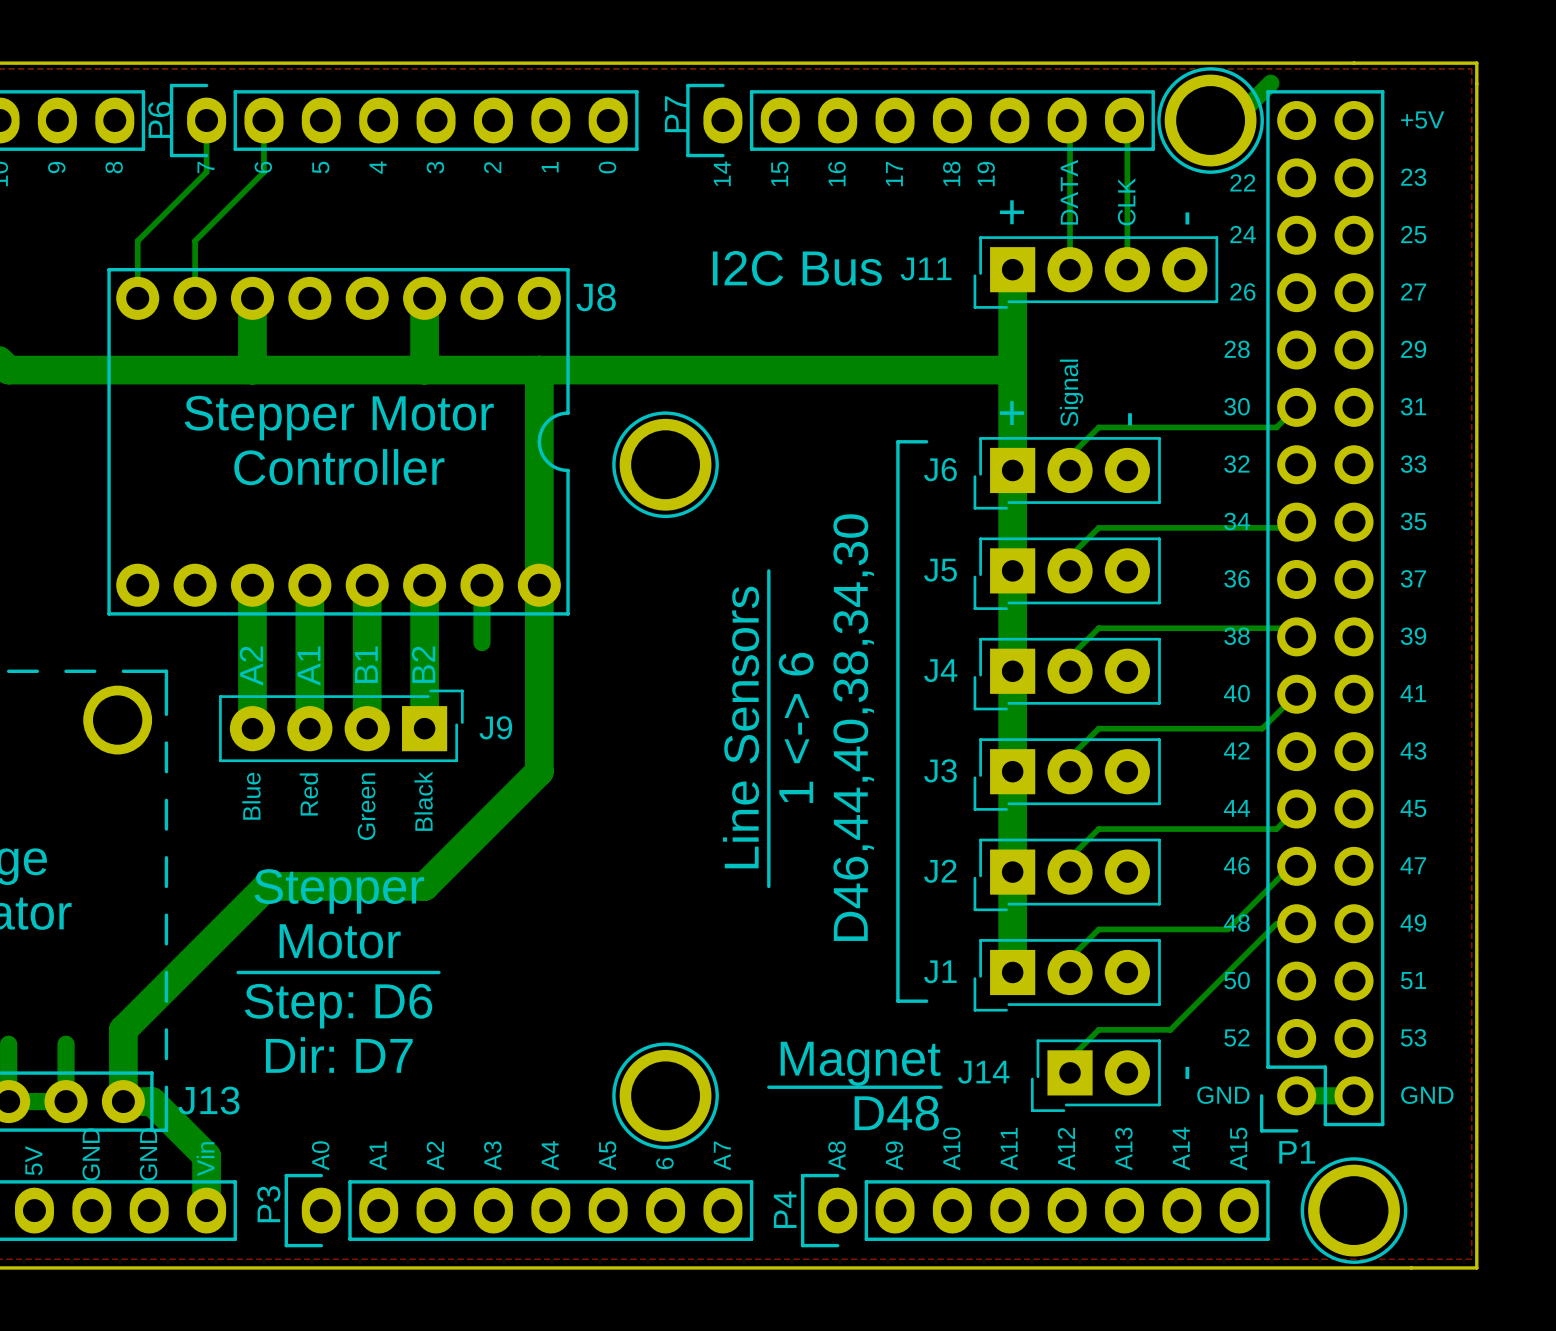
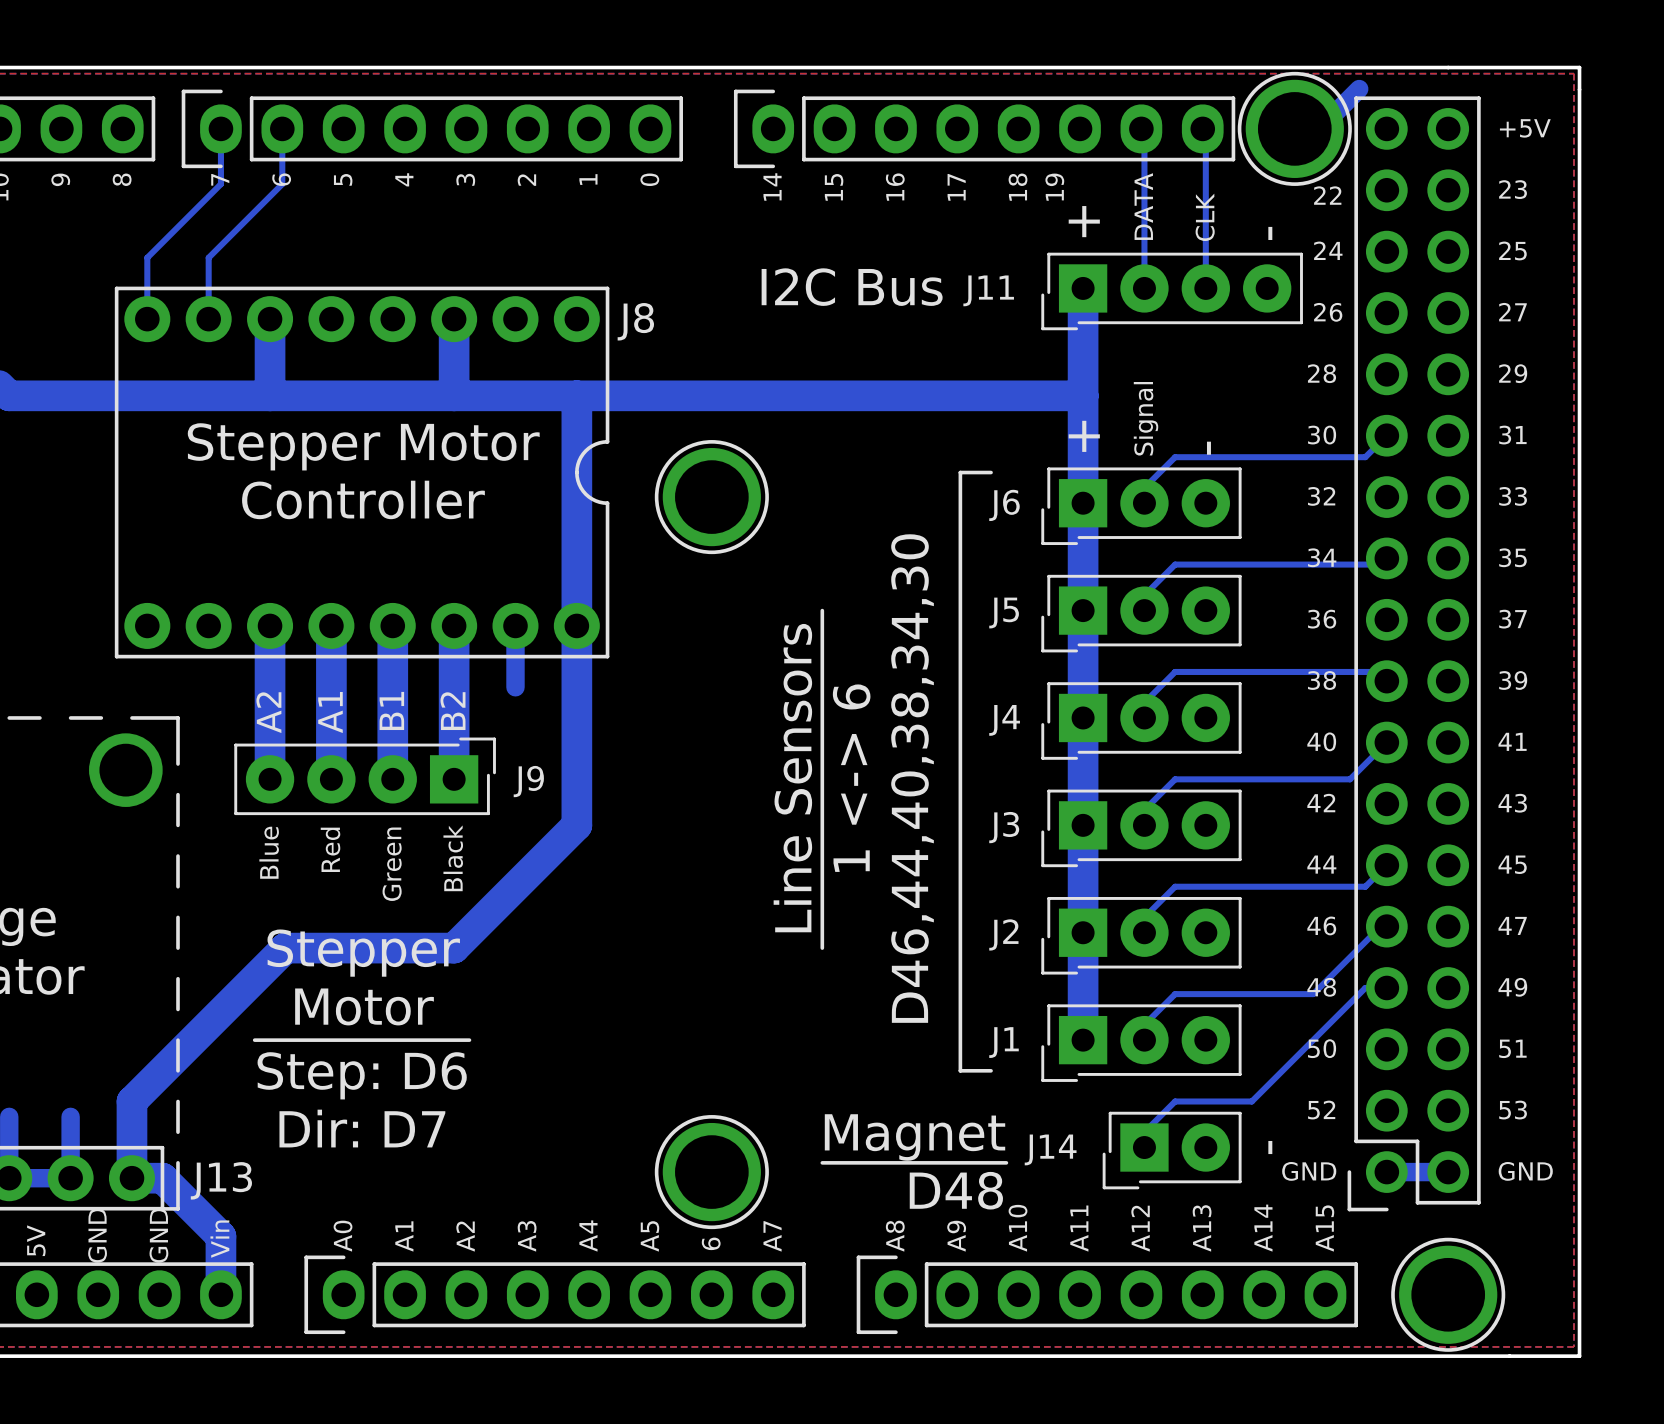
P7 name: P7 (676, 114) -> none
P6 name: P6 (159, 119) -> none
P1 name: P1 (1297, 1152) -> none
P3 name: P3 (268, 1204) -> none
P4 name: P4 (785, 1209) -> none

